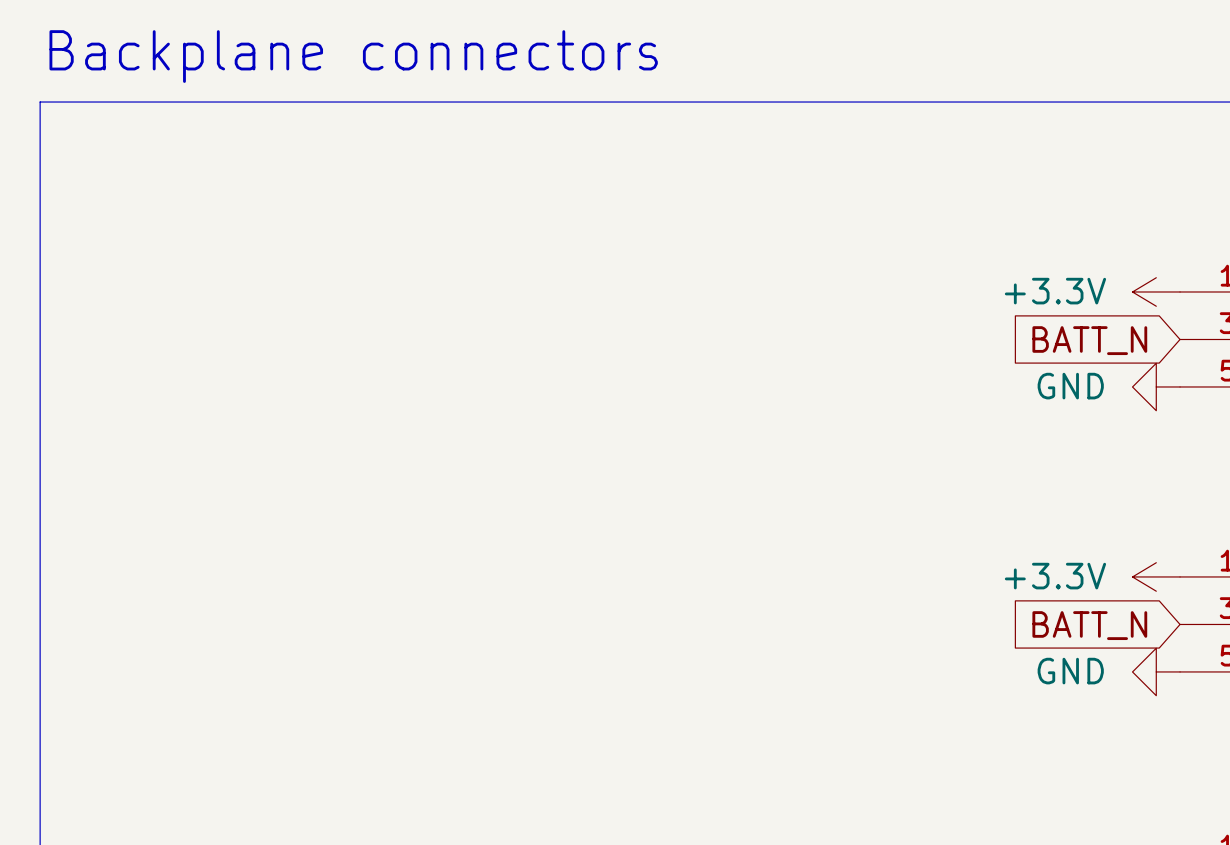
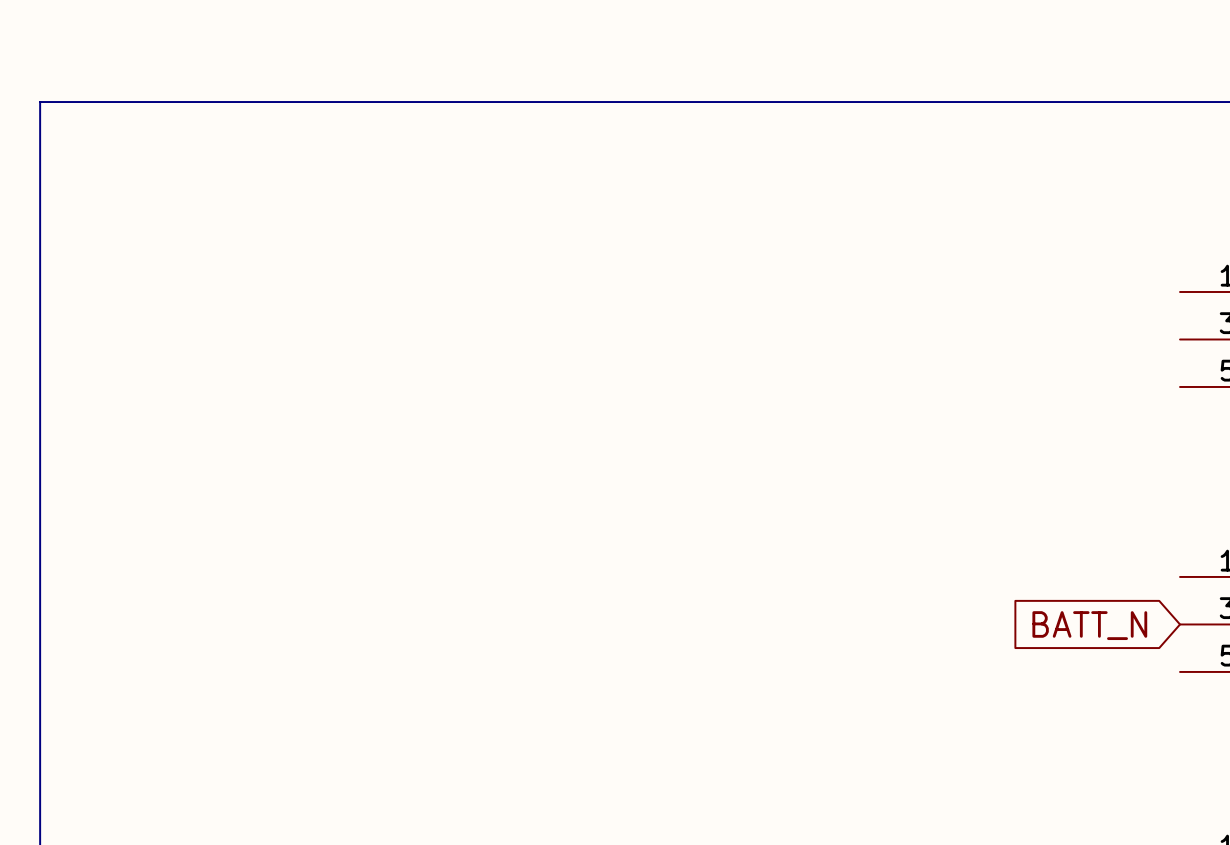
text: Backplane connectors (353, 56) -> none
power symbol: +3.3V (1156, 291) -> none
global label: BATT_N (1089, 340) -> none
power symbol: GND (1156, 386) -> none
power symbol: +3.3V (1156, 576) -> none
power symbol: GND (1156, 671) -> none

